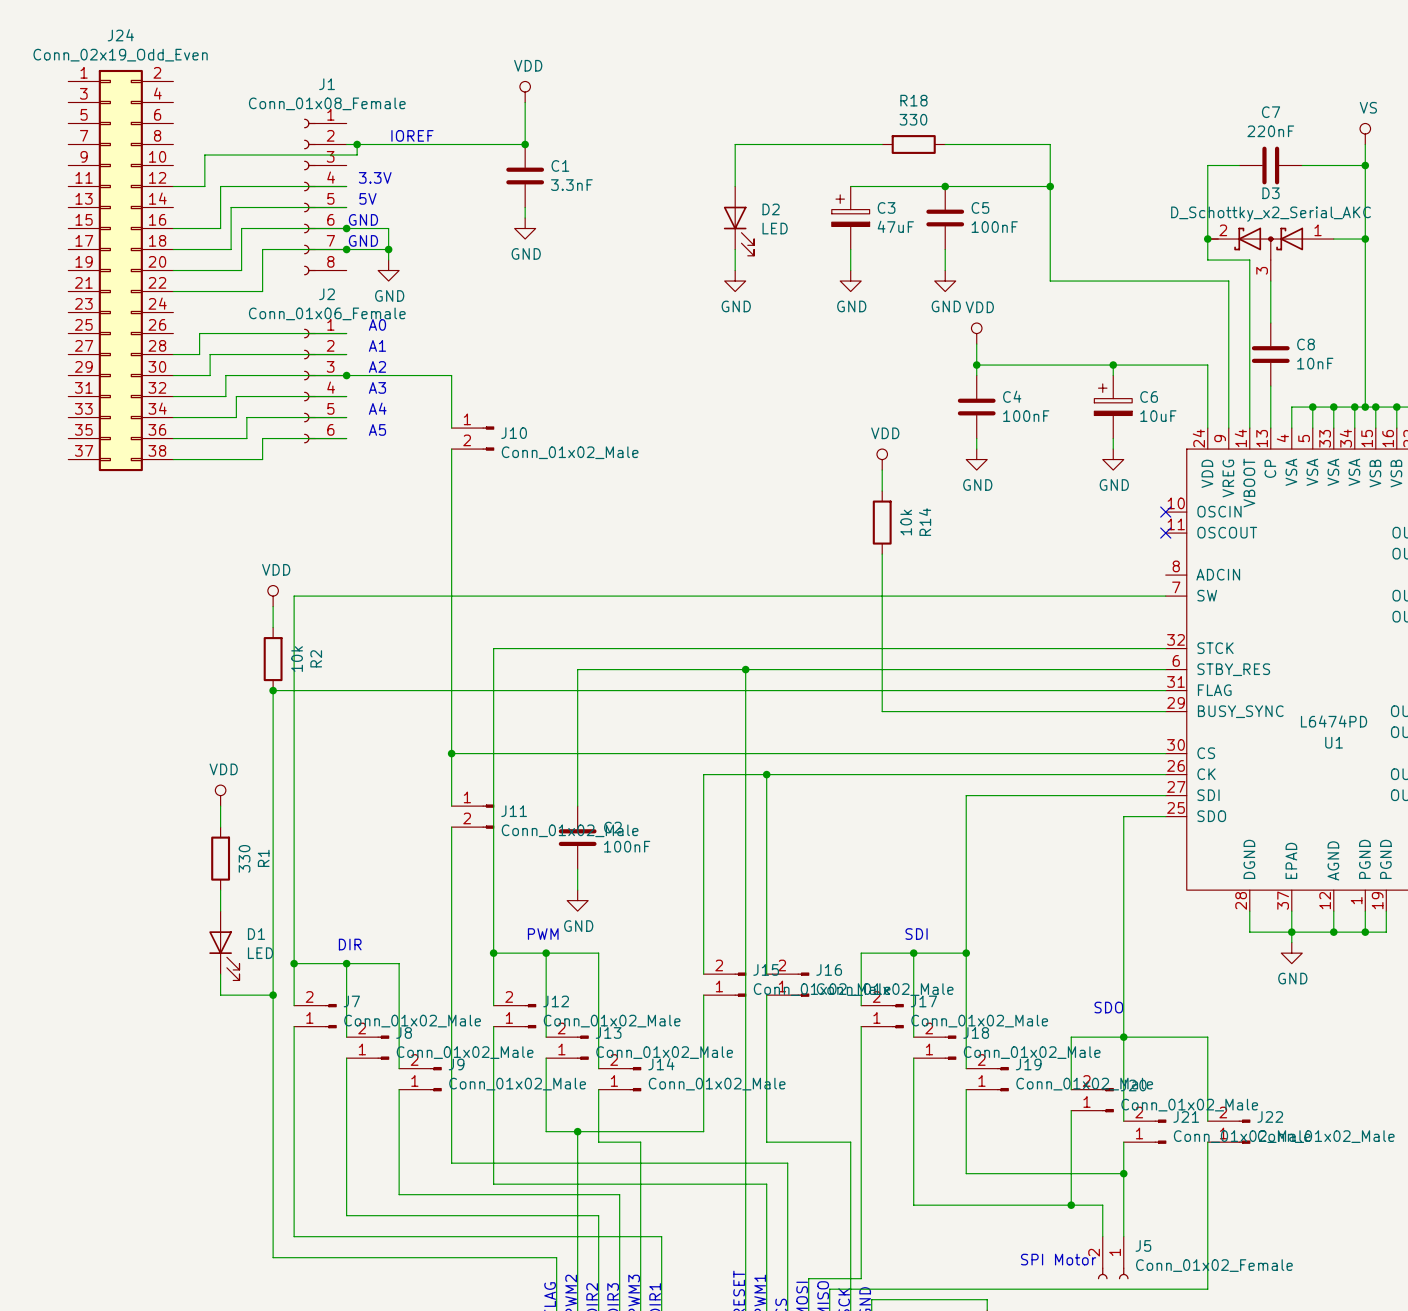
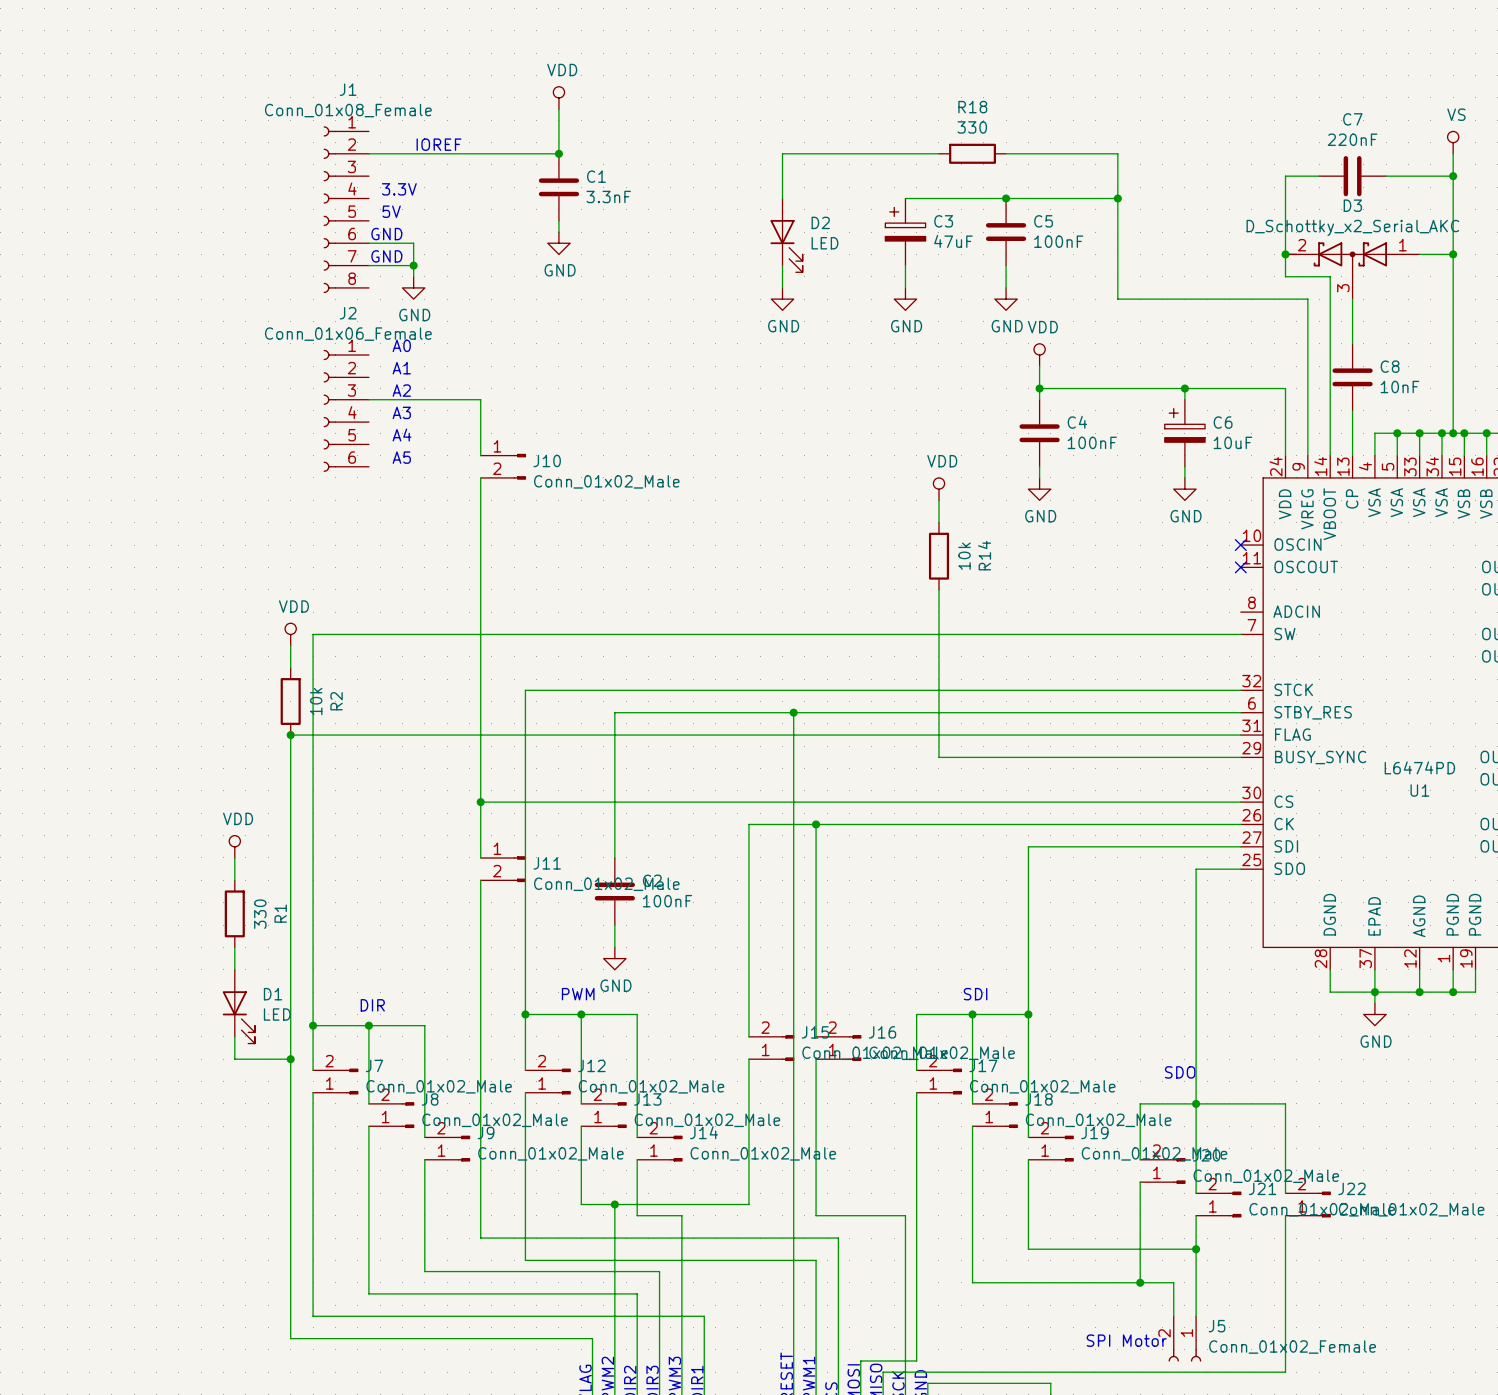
wire: (357, 144) (357, 155) (204, 155) (204, 186) (173, 186) -> none
junction: (357, 144) -> none
wire: (346, 186) (220, 186) (220, 228) (173, 228) -> none
wire: (346, 207) (231, 207) (231, 249) (173, 249) -> none
wire: (346, 228) (241, 228) (241, 270) (173, 270) -> none
junction: (346, 228) -> none
wire: (346, 249) (262, 249) (262, 291) (173, 291) -> none
junction: (346, 249) -> none
J24: Conn_02x19_Odd_Even (120, 270) -> none
wire: (346, 333) (199, 333) (199, 354) (173, 354) -> none
wire: (346, 354) (210, 354) (210, 375) (173, 375) -> none
wire: (346, 375) (225, 375) (225, 396) (173, 396) -> none
junction: (346, 375) -> none
wire: (346, 396) (236, 396) (236, 417) (173, 417) -> none
wire: (346, 417) (246, 417) (246, 438) (173, 438) -> none
wire: (346, 438) (262, 438) (262, 459) (173, 459) -> none

